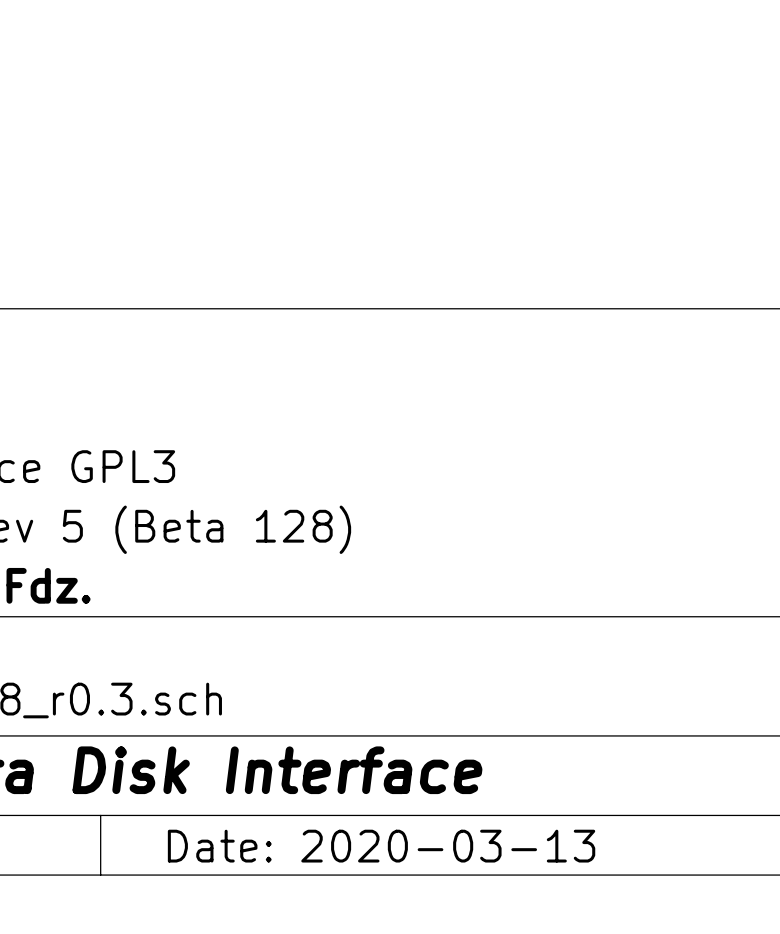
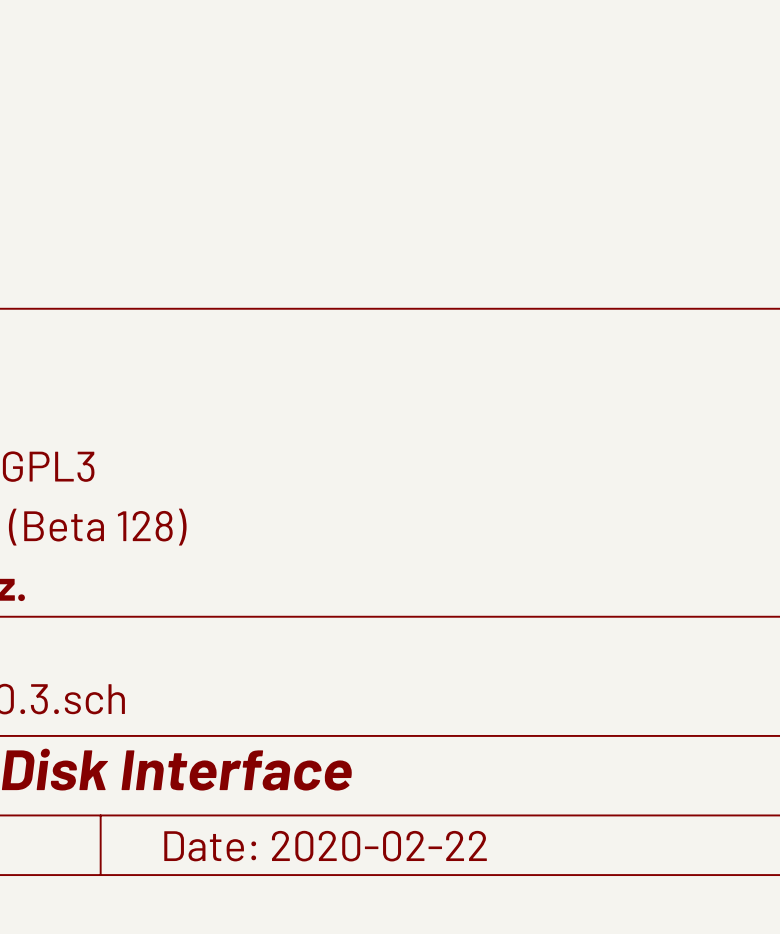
title block: Date: 2020-03-13 (381, 846) -> Date: 2020-02-22 (325, 846)

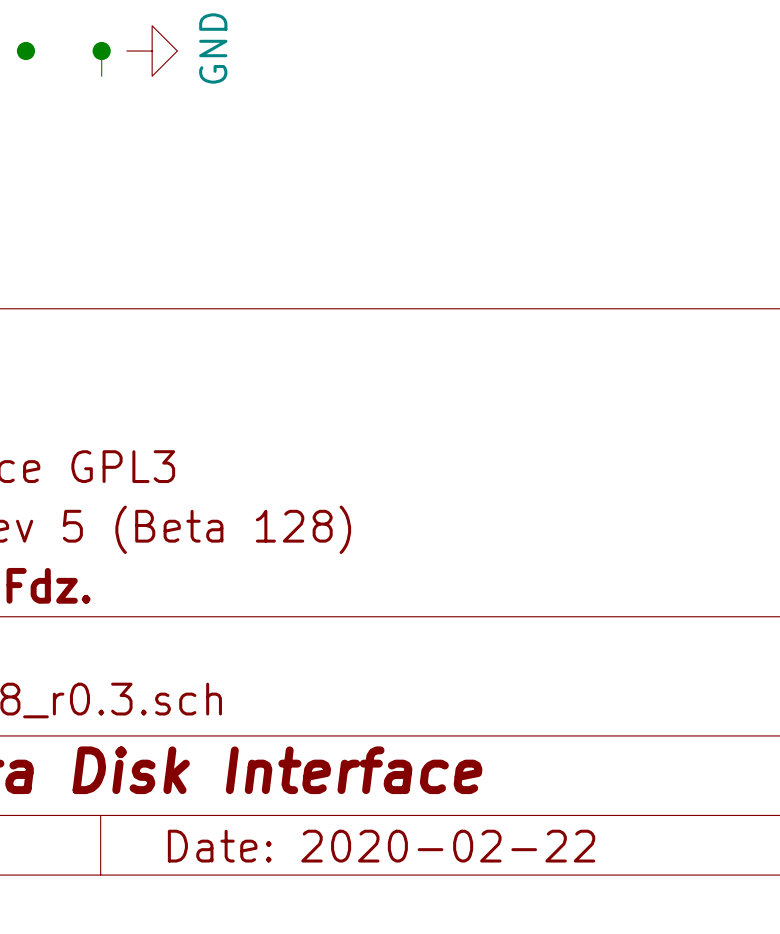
junction: none -> (25, 51)
wire: none -> (101, 51) (101, 76)
junction: none -> (101, 51)
power symbol: none -> GND (152, 51)

